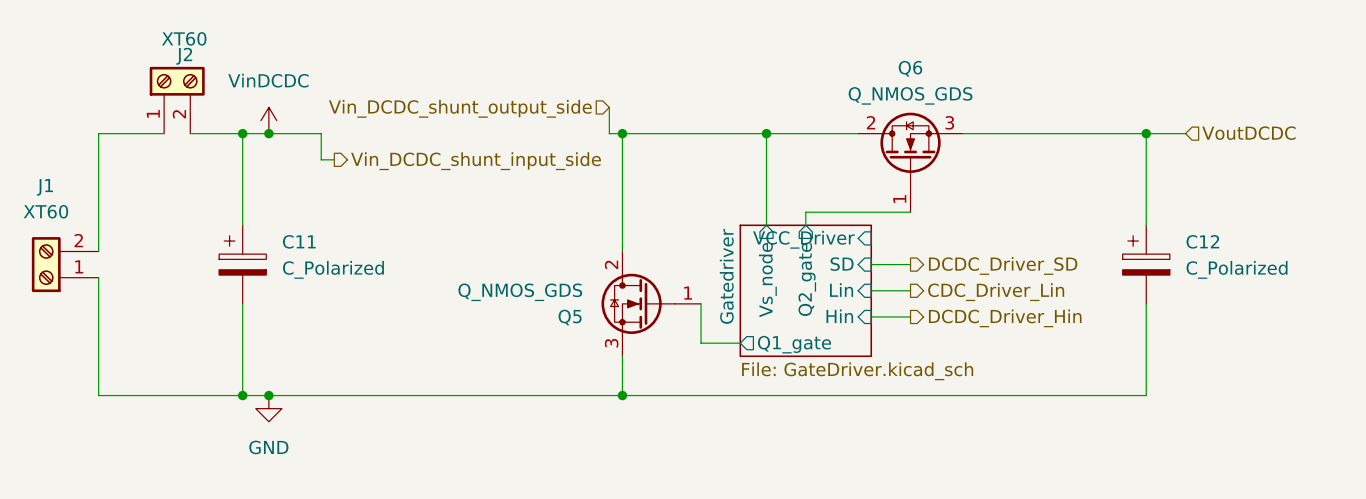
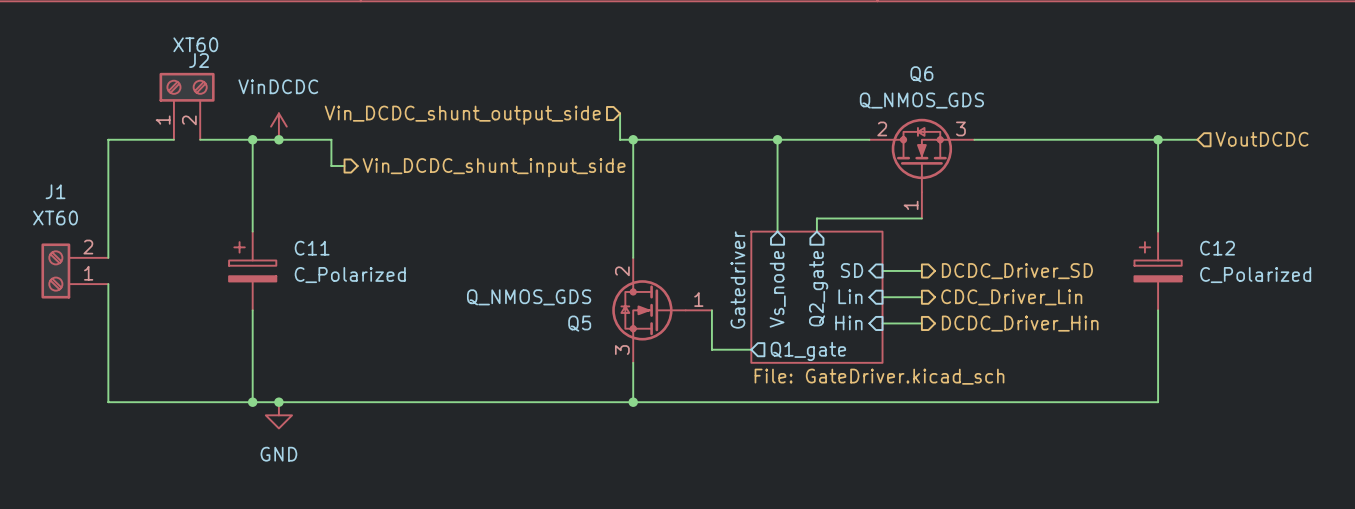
sheet pin: VCC_Driver (803, 239) -> none

